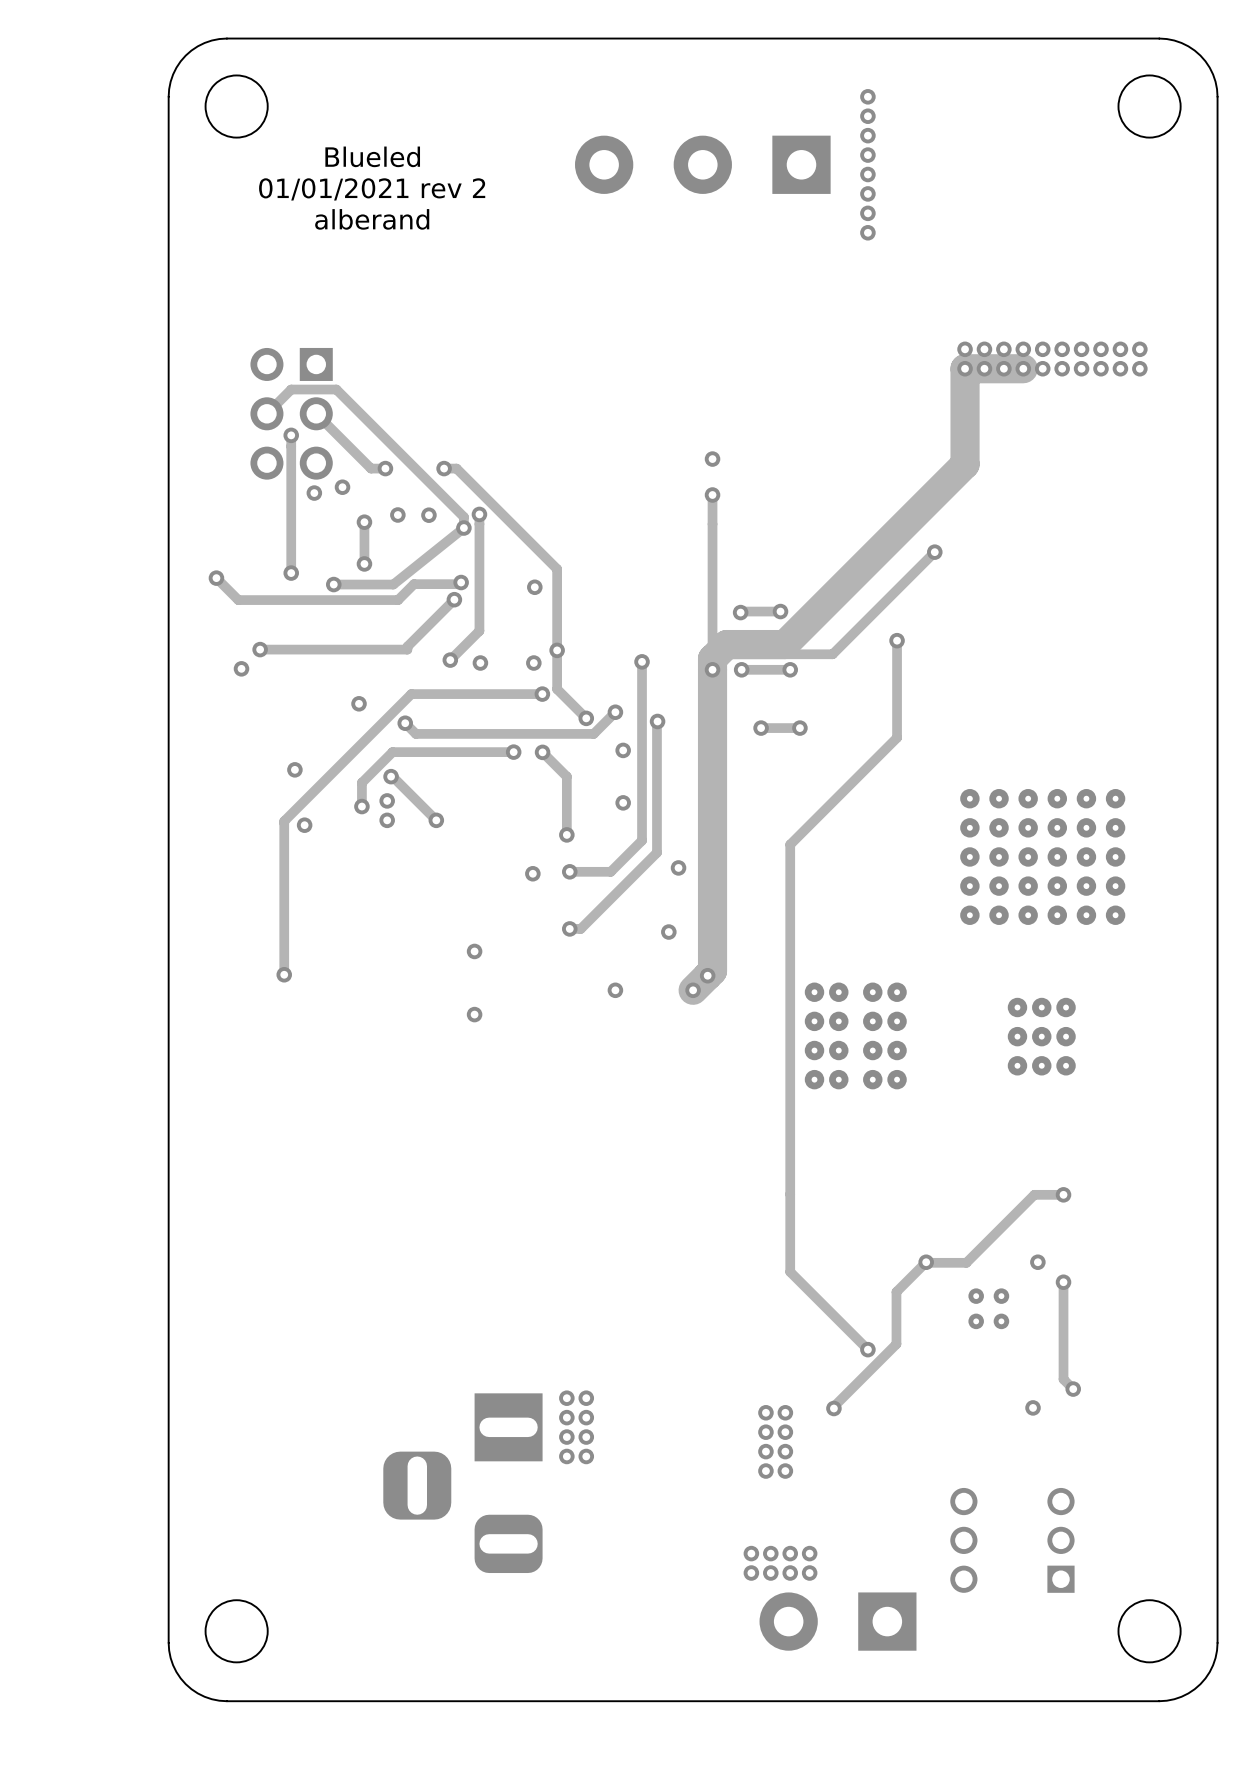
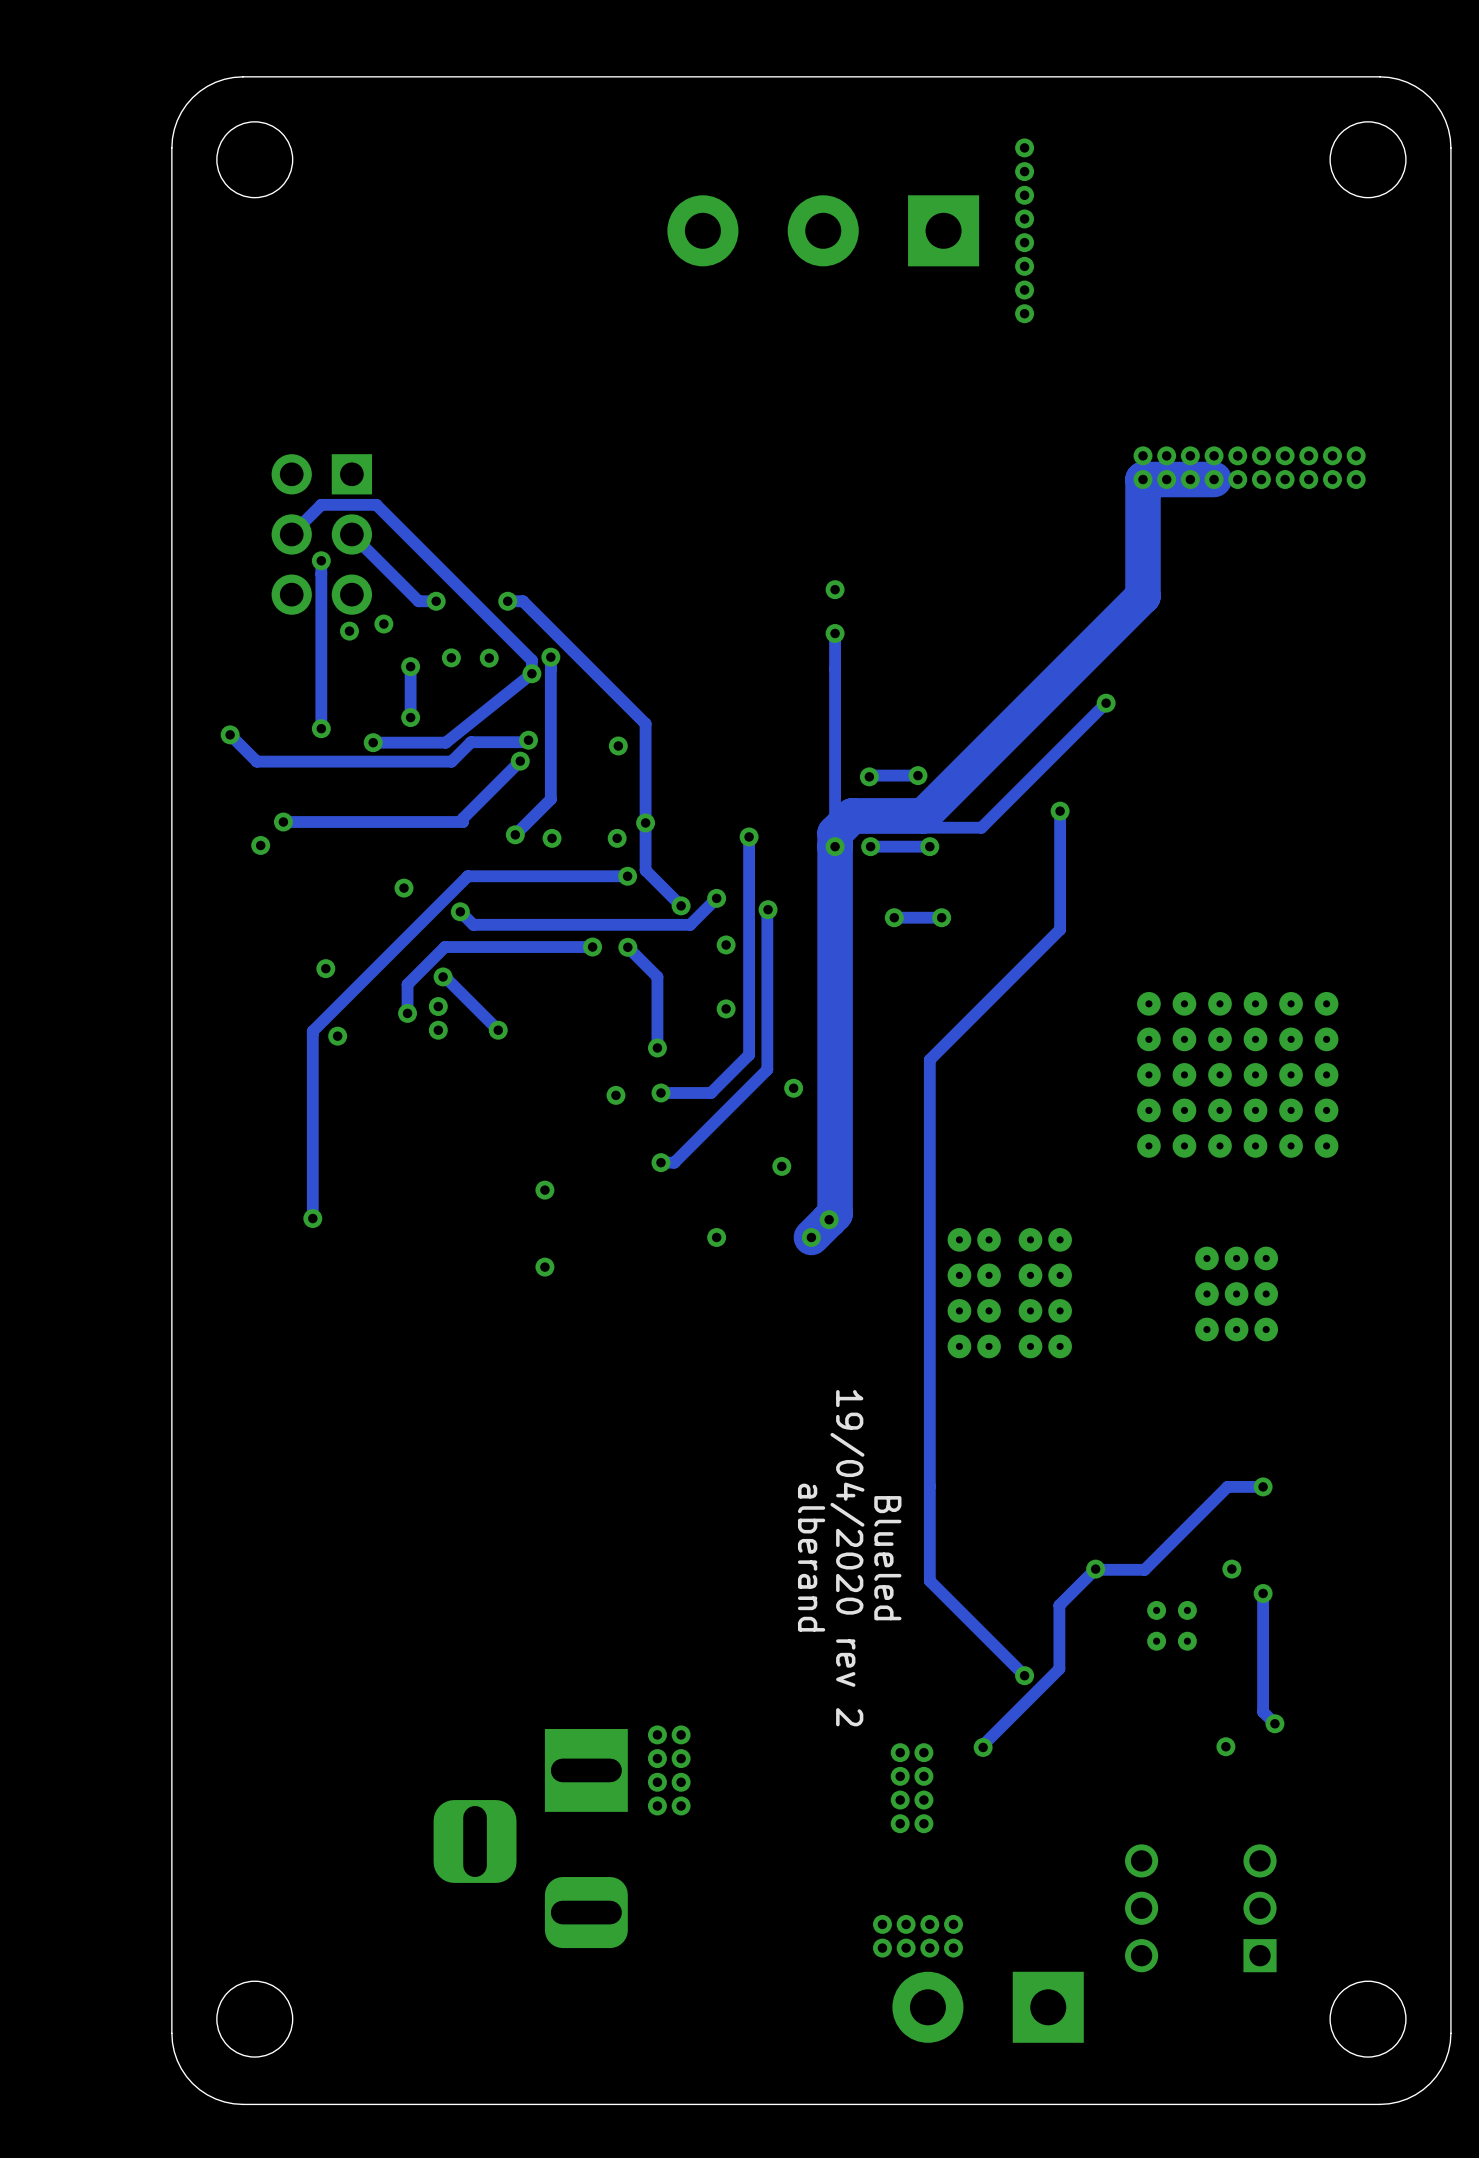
text: Blueled (372, 156) -> none
text: 01/01/2021 rev 2 (372, 189) -> none
text: alberand (372, 219) -> none
text: none -> alberand (811, 1557)
text: none -> 19/04/2020 rev 2 (847, 1558)
text: none -> Blueled (887, 1558)

